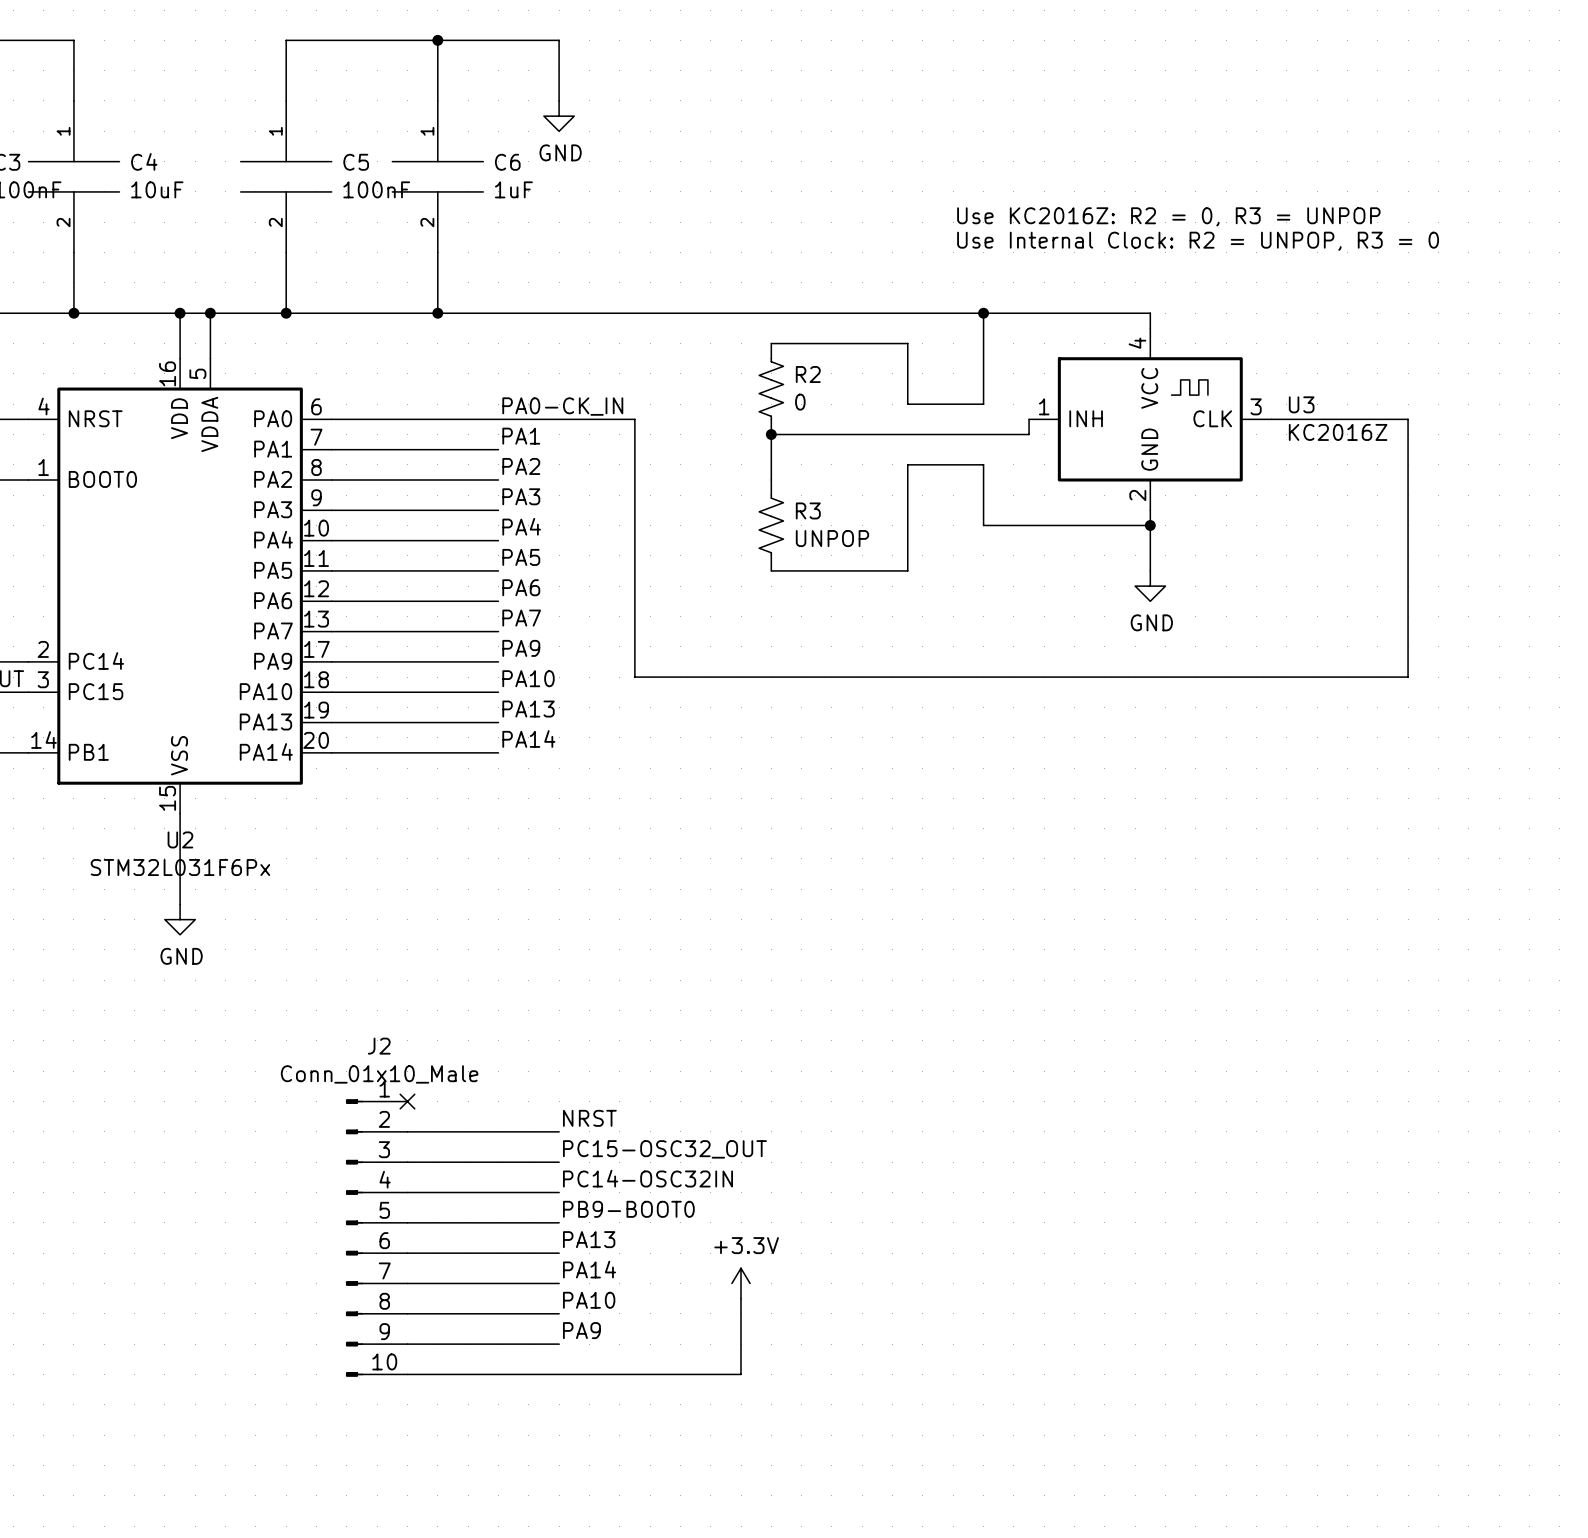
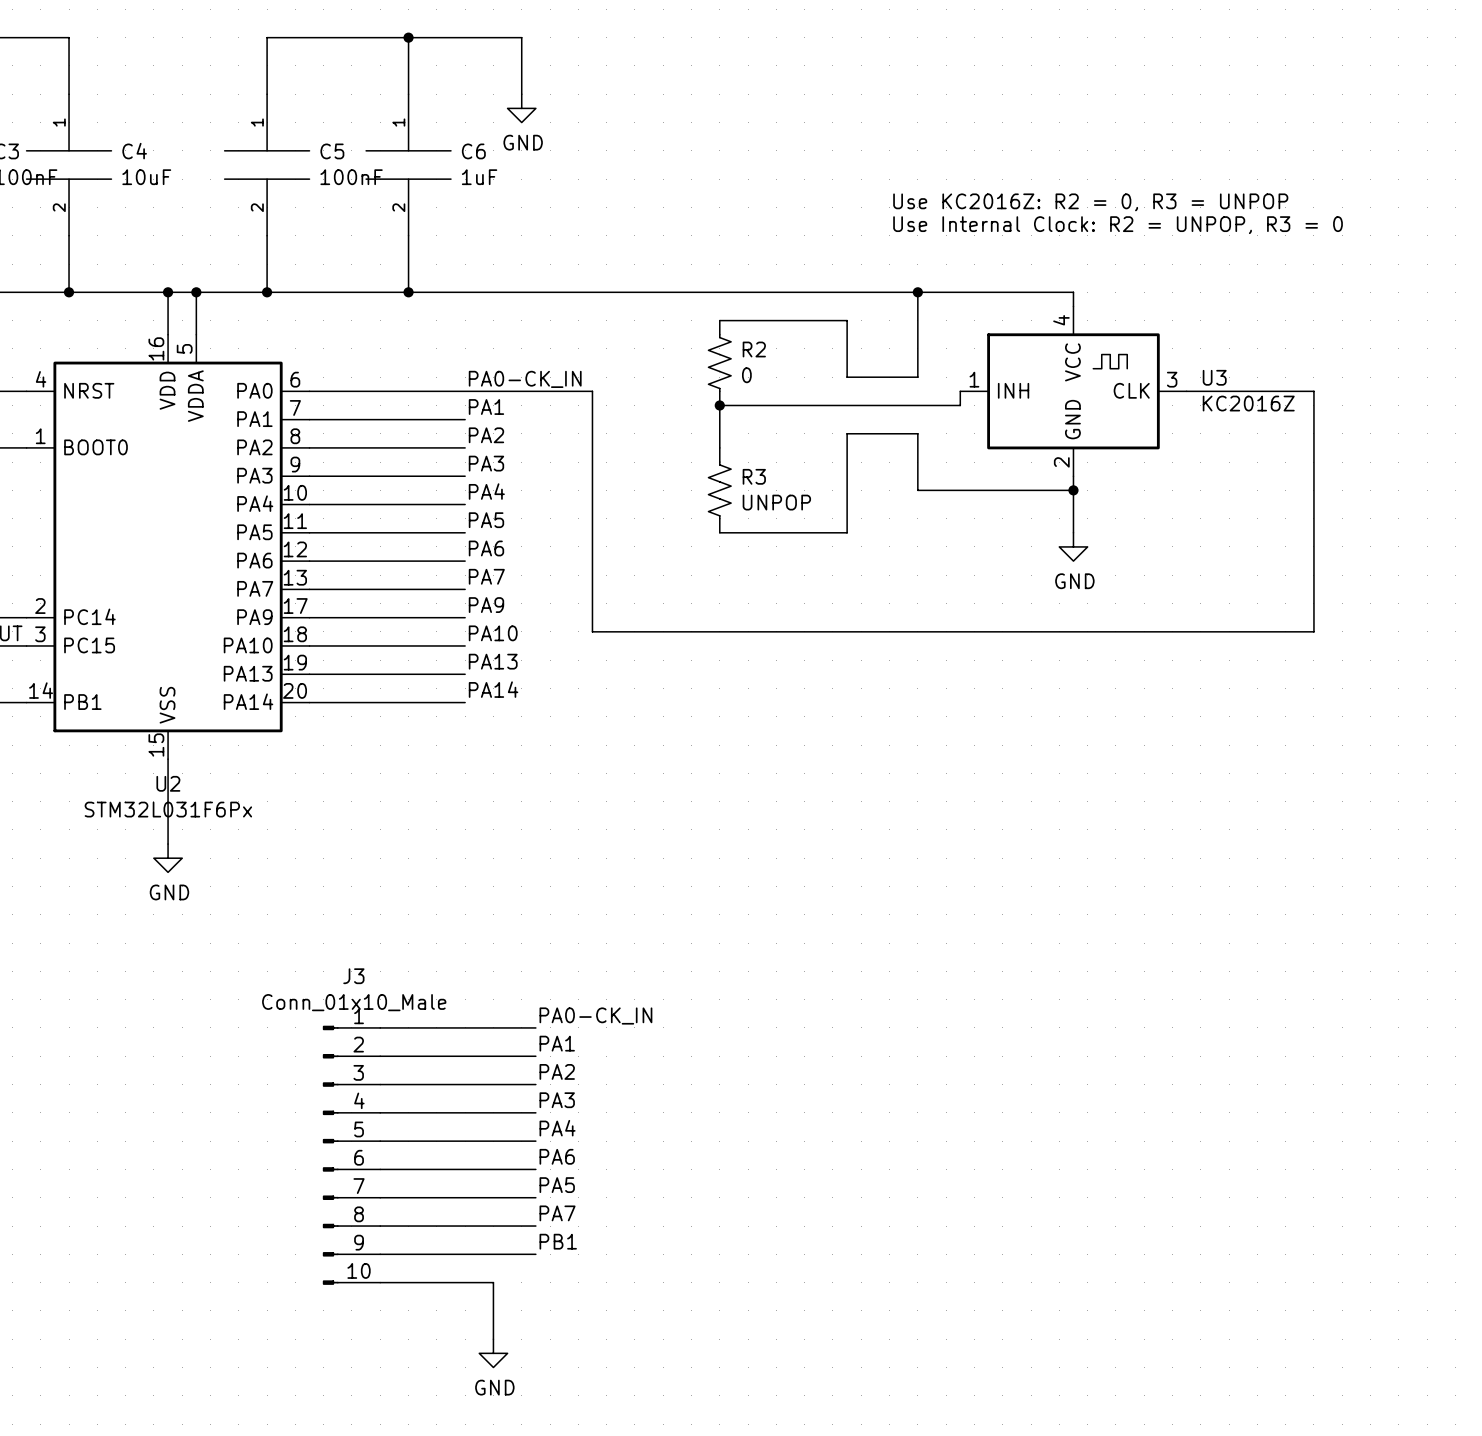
J2 name: J2 (379, 1046) -> J3 (353, 976)
label: none -> PA0-CK_IN (595, 1016)
wire: none -> (380, 1027) (535, 1027)
no-connect mark: (407, 1101) -> none
label: NRST (589, 1118) -> none
label: none -> PA1 (557, 1043)
wire: none -> (521, 1056) (535, 1056)
label: none -> PA2 (557, 1071)
label: PC15-OSC32_OUT (664, 1149) -> none
wire: none -> (521, 1084) (535, 1084)
label: none -> PA3 (557, 1100)
label: PC14-OSC32IN (647, 1178) -> none
wire: none -> (521, 1112) (535, 1112)
label: none -> PA4 (557, 1128)
label: PB9-BOOT0 (628, 1209) -> none
wire: none -> (521, 1141) (535, 1141)
label: PA13 (589, 1239) -> none
label: none -> PA6 (557, 1156)
wire: none -> (521, 1169) (535, 1169)
label: PA14 (589, 1269) -> none
label: none -> PA5 (557, 1185)
wire: none -> (521, 1197) (535, 1197)
power symbol: +3.3V (741, 1283) -> none
wire: (741, 1298) (741, 1374) (528, 1374) -> (493, 1339) (493, 1282)
label: PA10 (589, 1300) -> none
wire: none -> (521, 1226) (535, 1226)
label: PA9 (581, 1330) -> PA7 (557, 1213)
label: none -> PB1 (558, 1241)
wire: none -> (521, 1254) (535, 1254)
power symbol: none -> GND (493, 1353)

